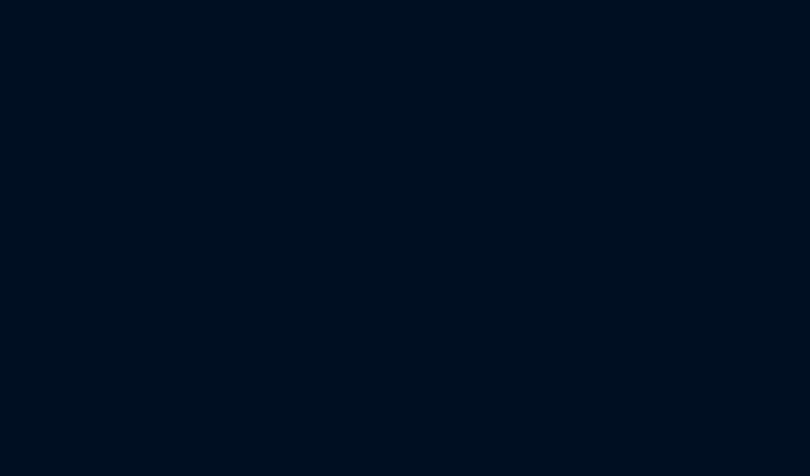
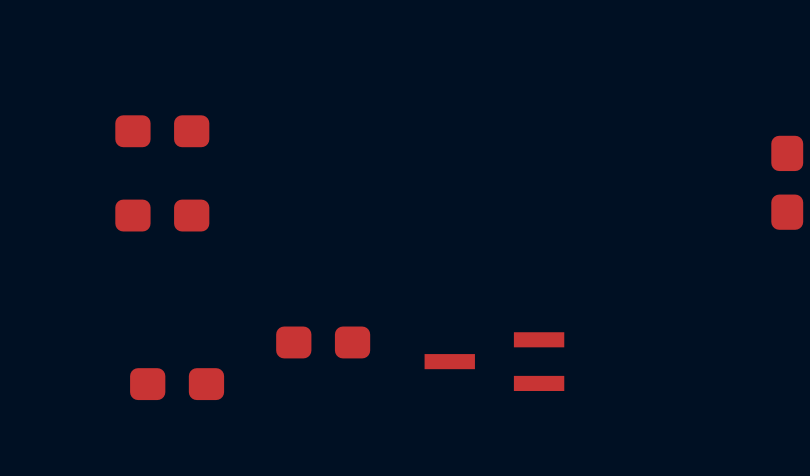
part: none -> (162, 131)
part: none -> (787, 182)
part: none -> (162, 215)
part: none -> (323, 342)
part: none -> (494, 361)
part: none -> (177, 384)

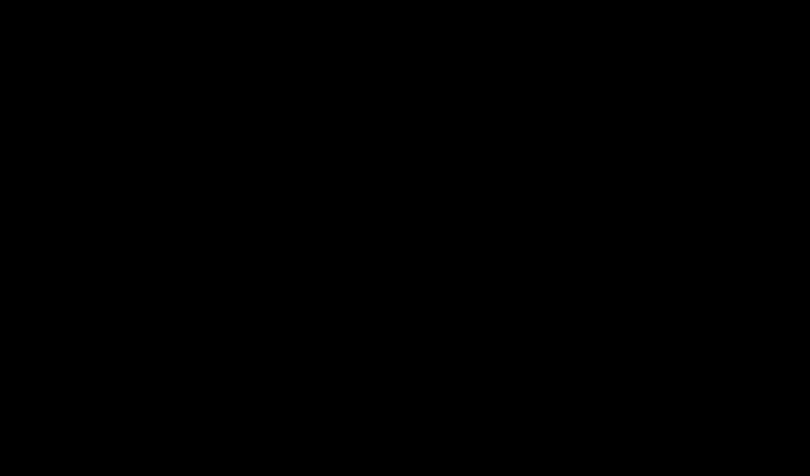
part: (162, 131) -> none
part: (787, 182) -> none
part: (162, 215) -> none
part: (323, 342) -> none
part: (494, 361) -> none
part: (177, 384) -> none

